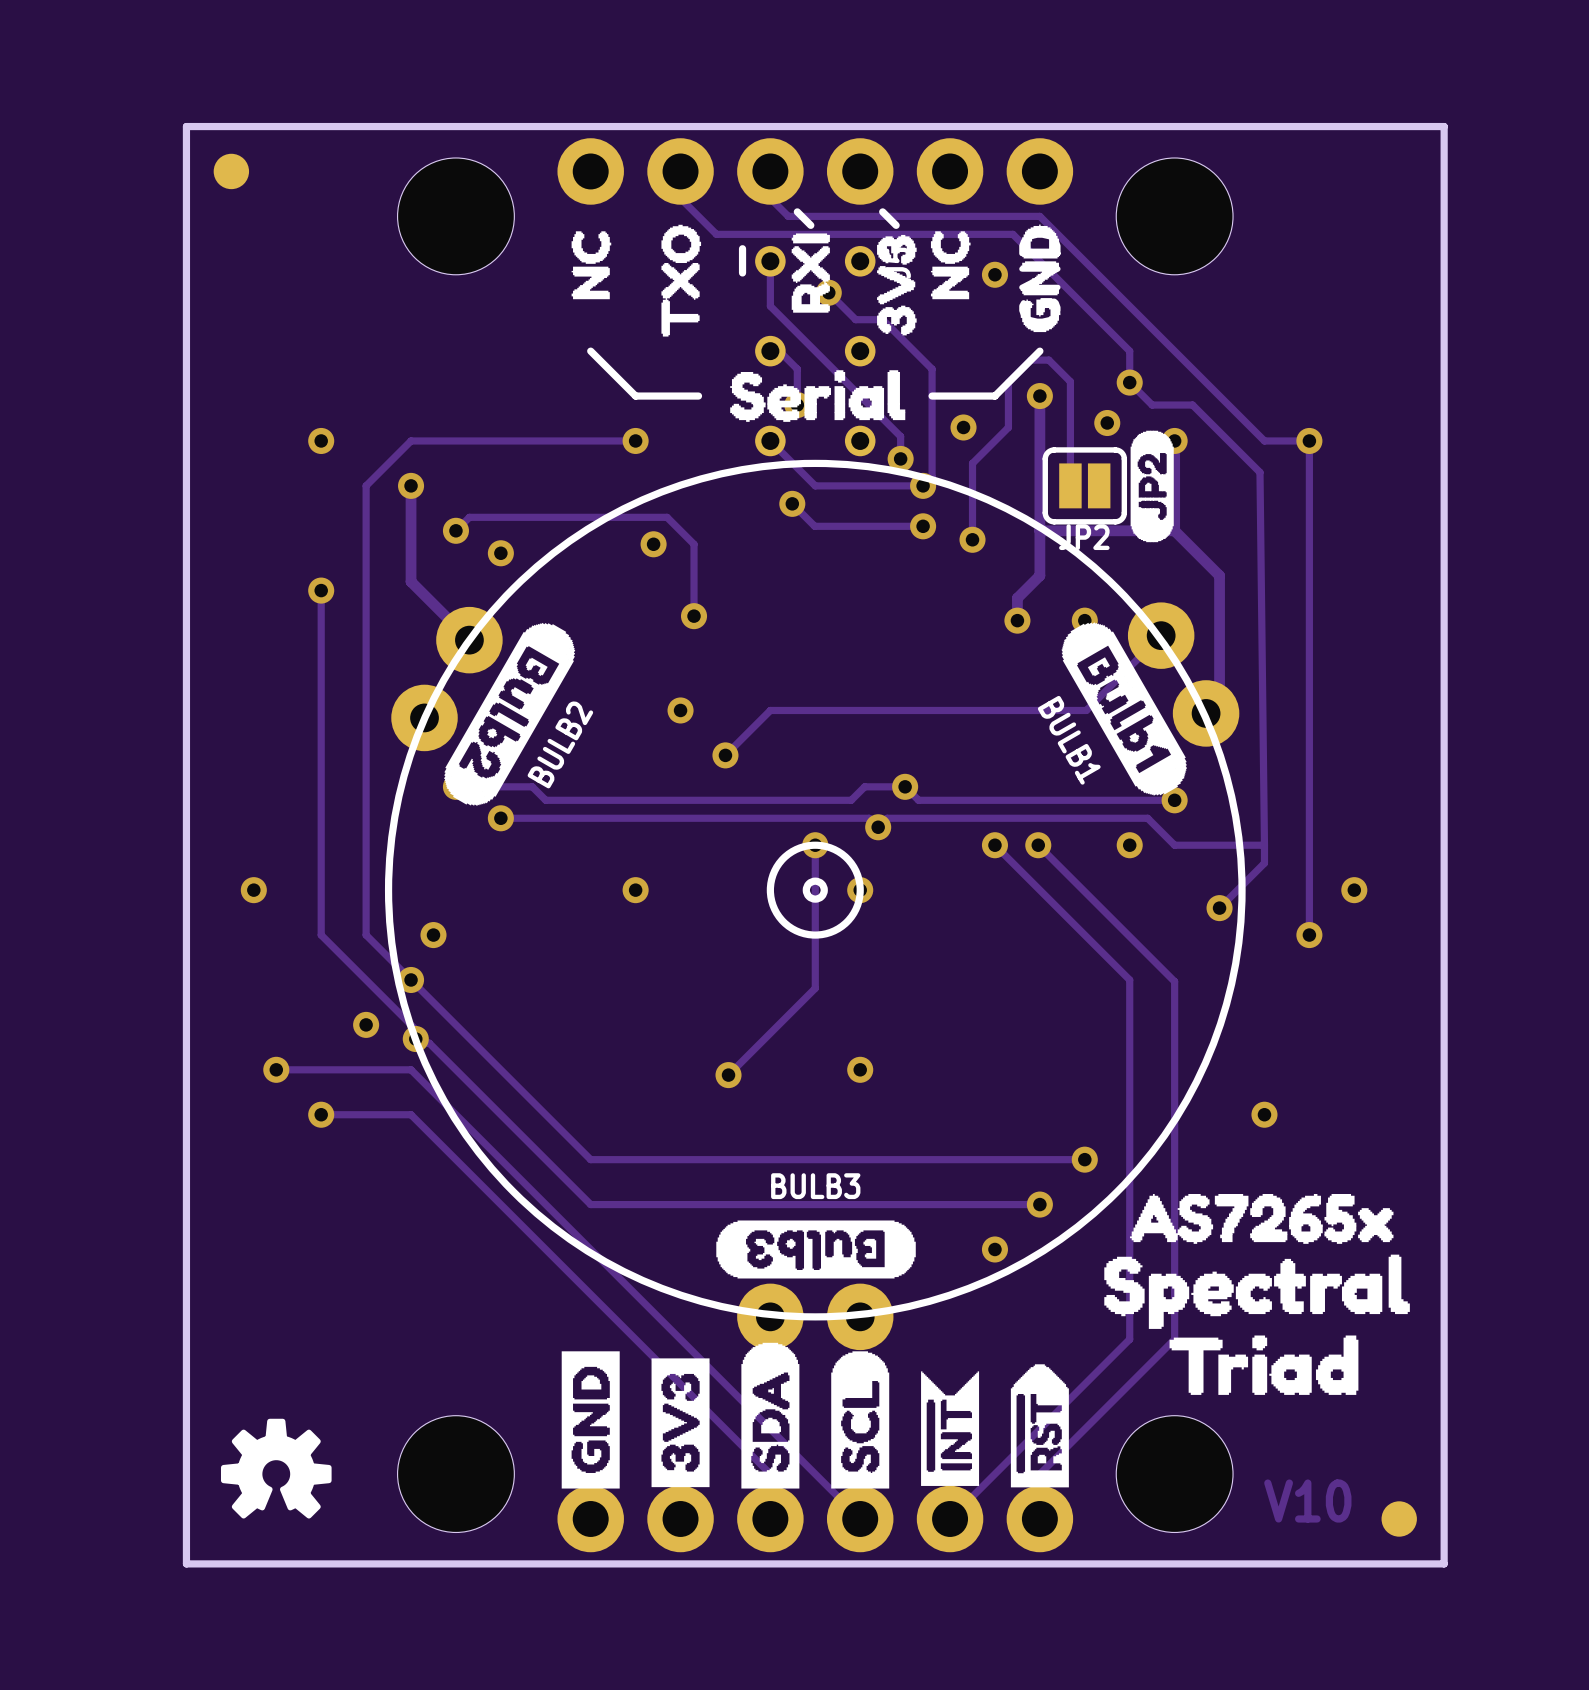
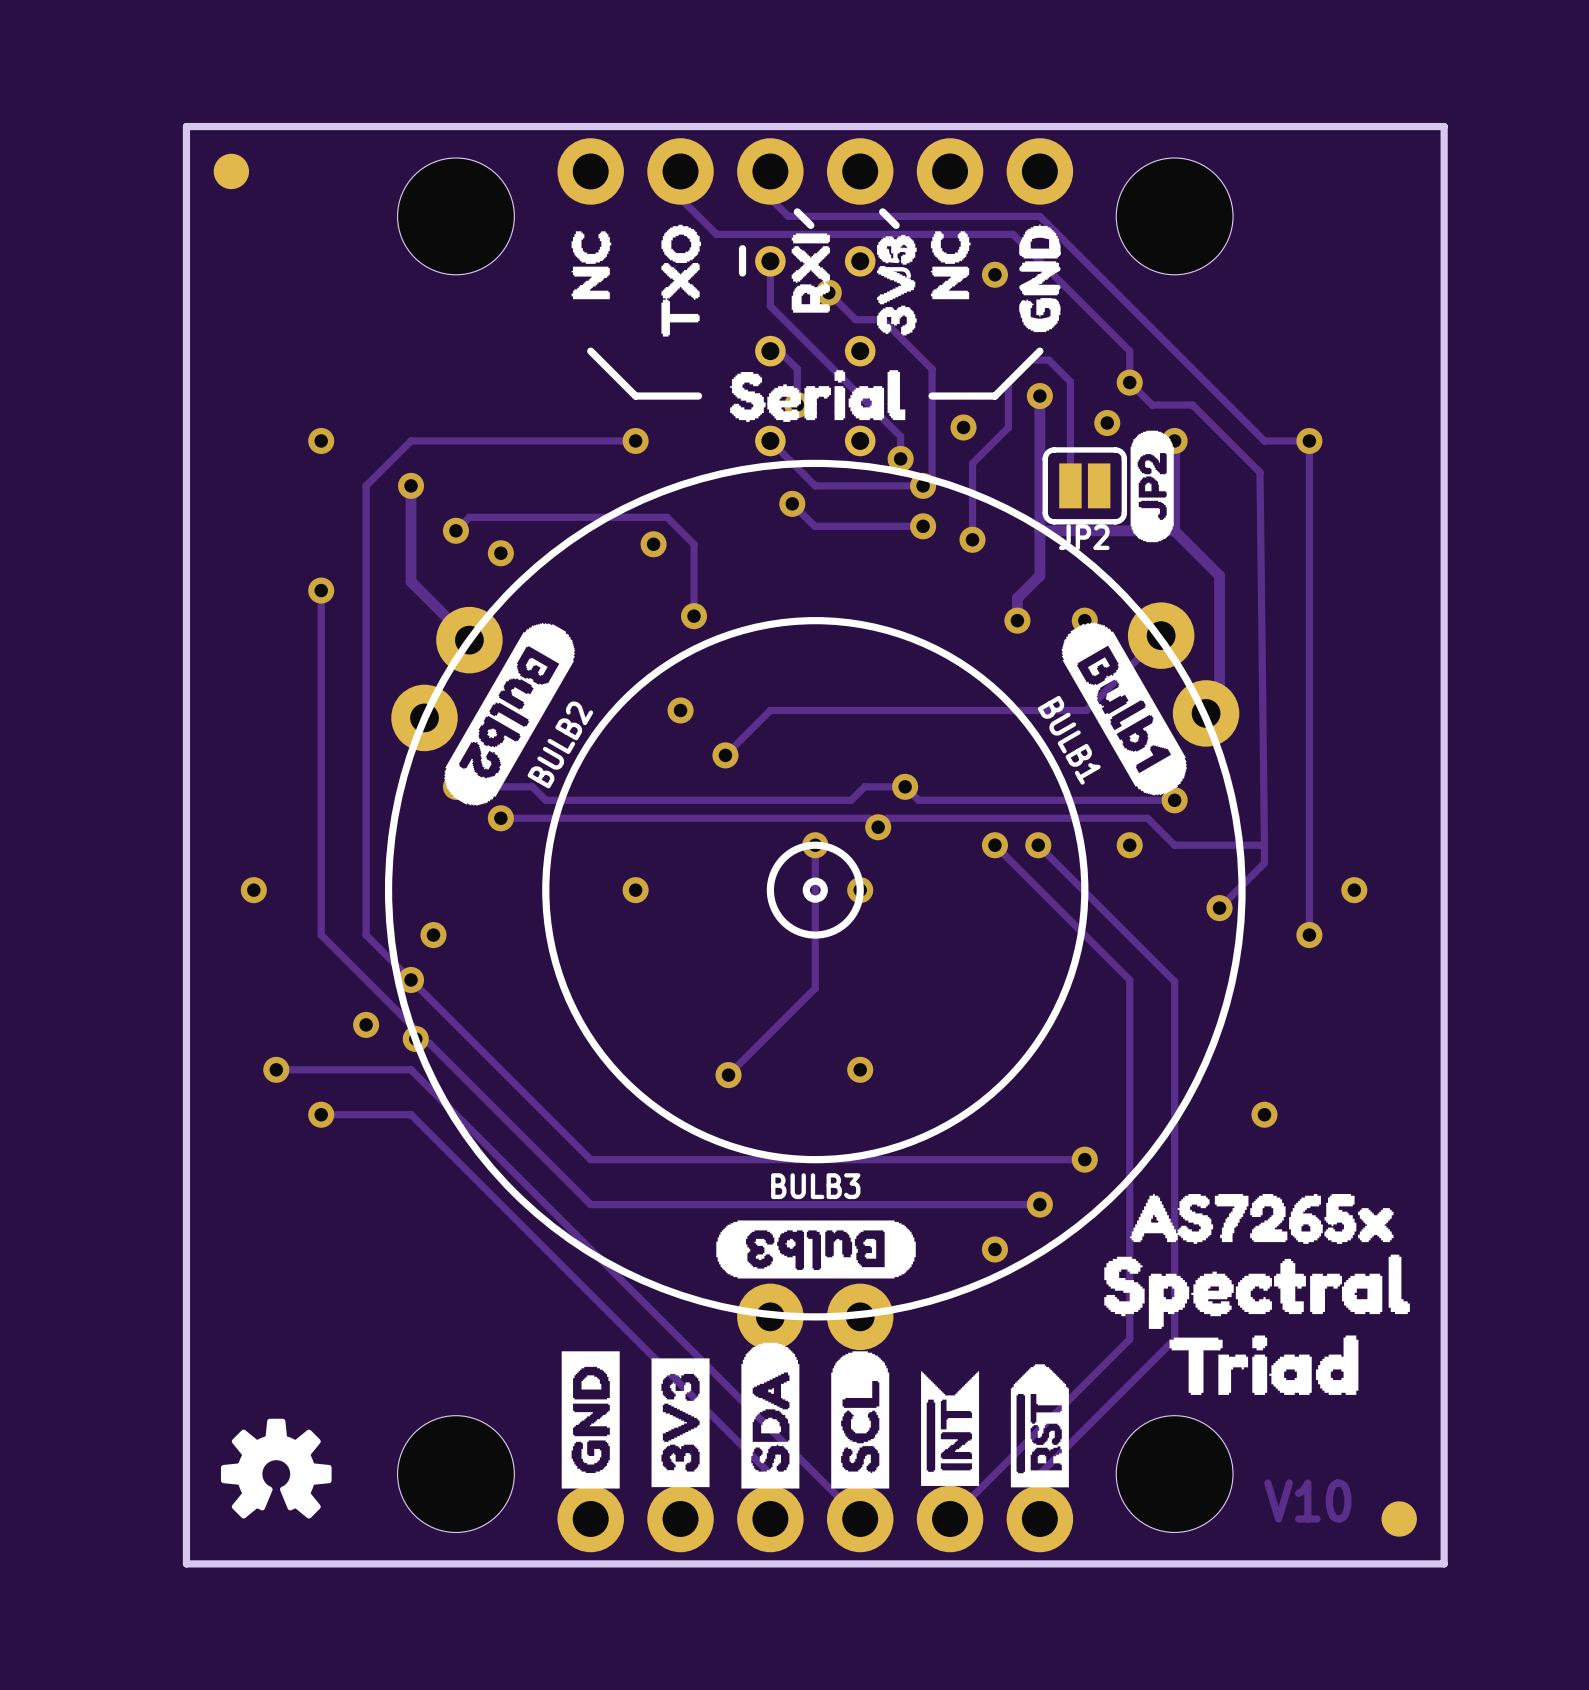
drawing: none -> [542, 617, 1089, 1164]

